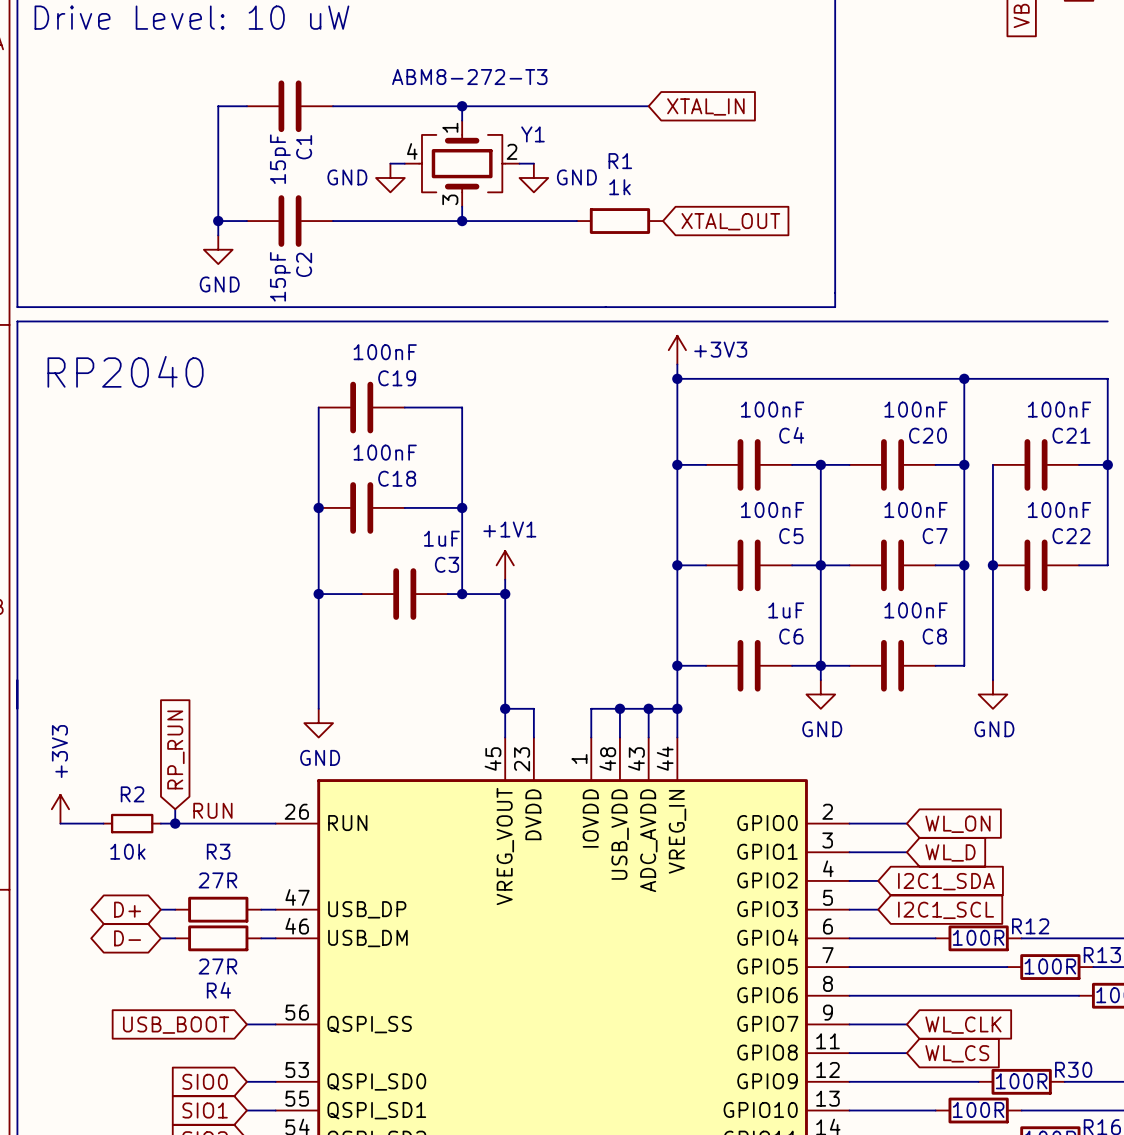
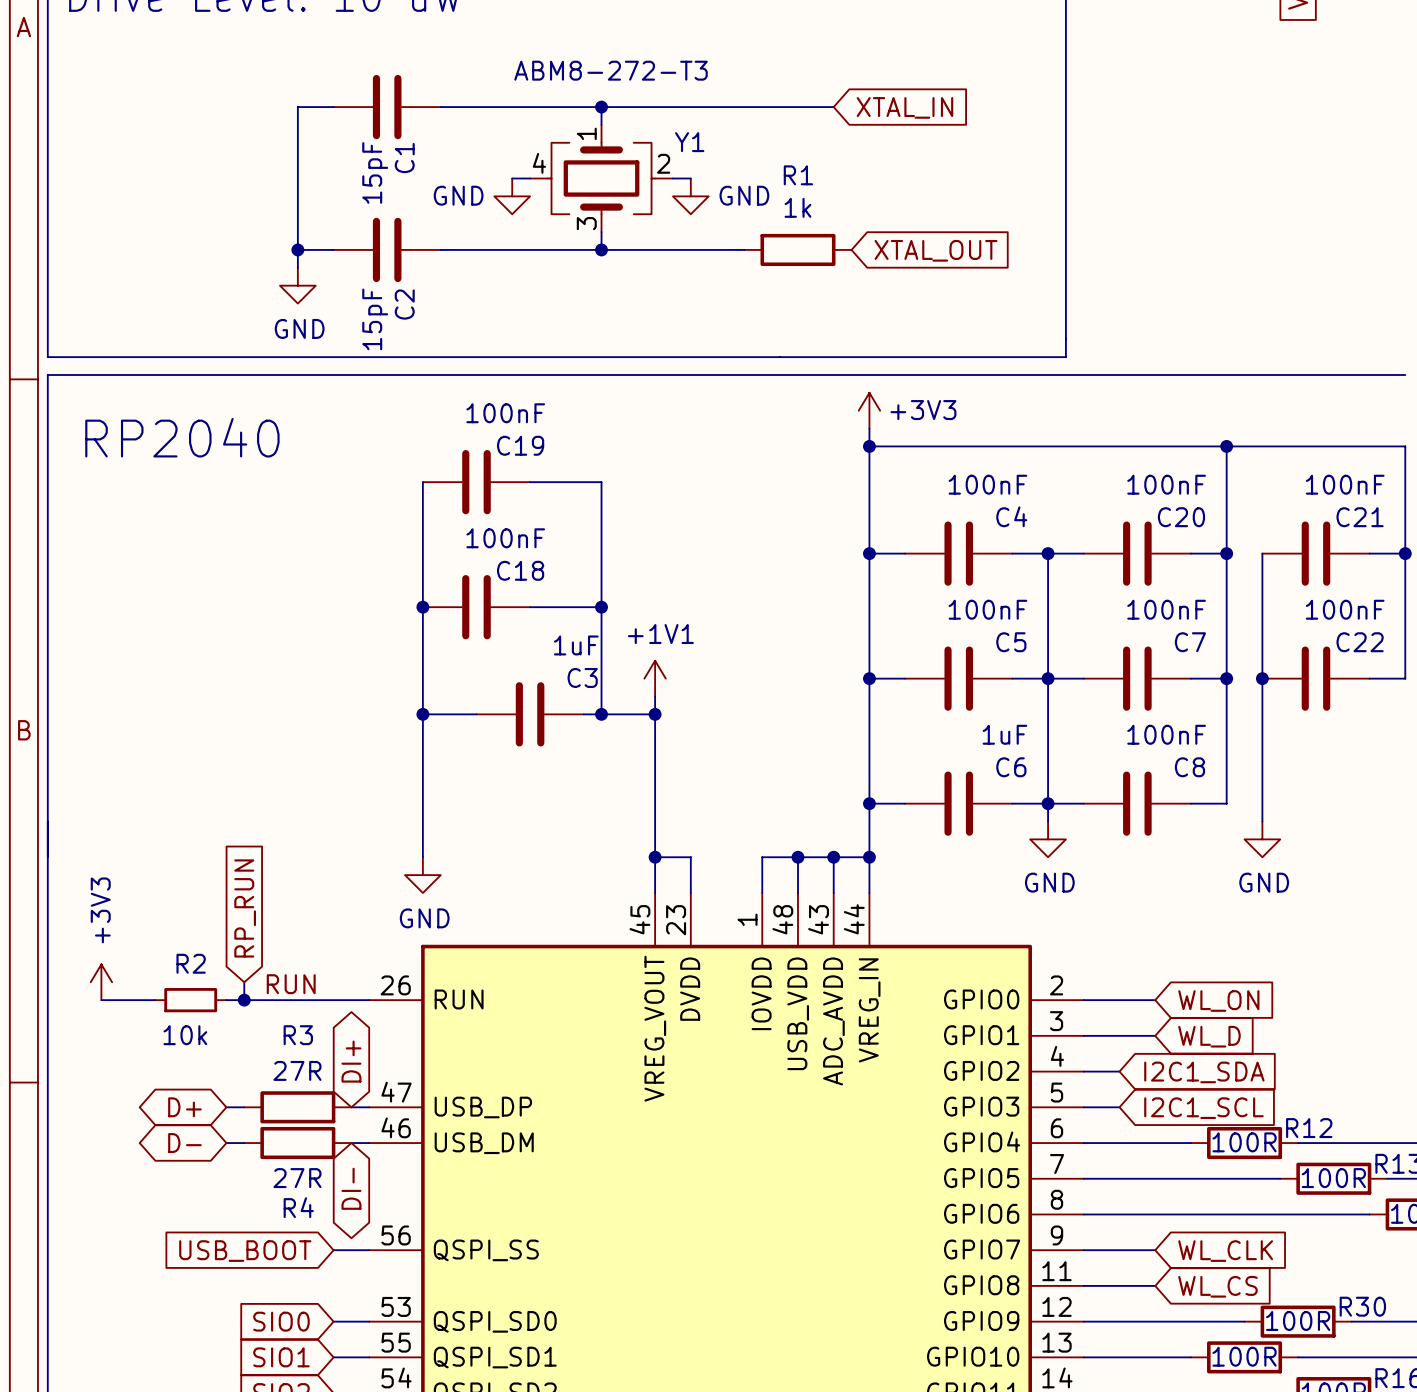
global label: none -> DI+ (351, 1061)
global label: none -> DI- (351, 1188)

